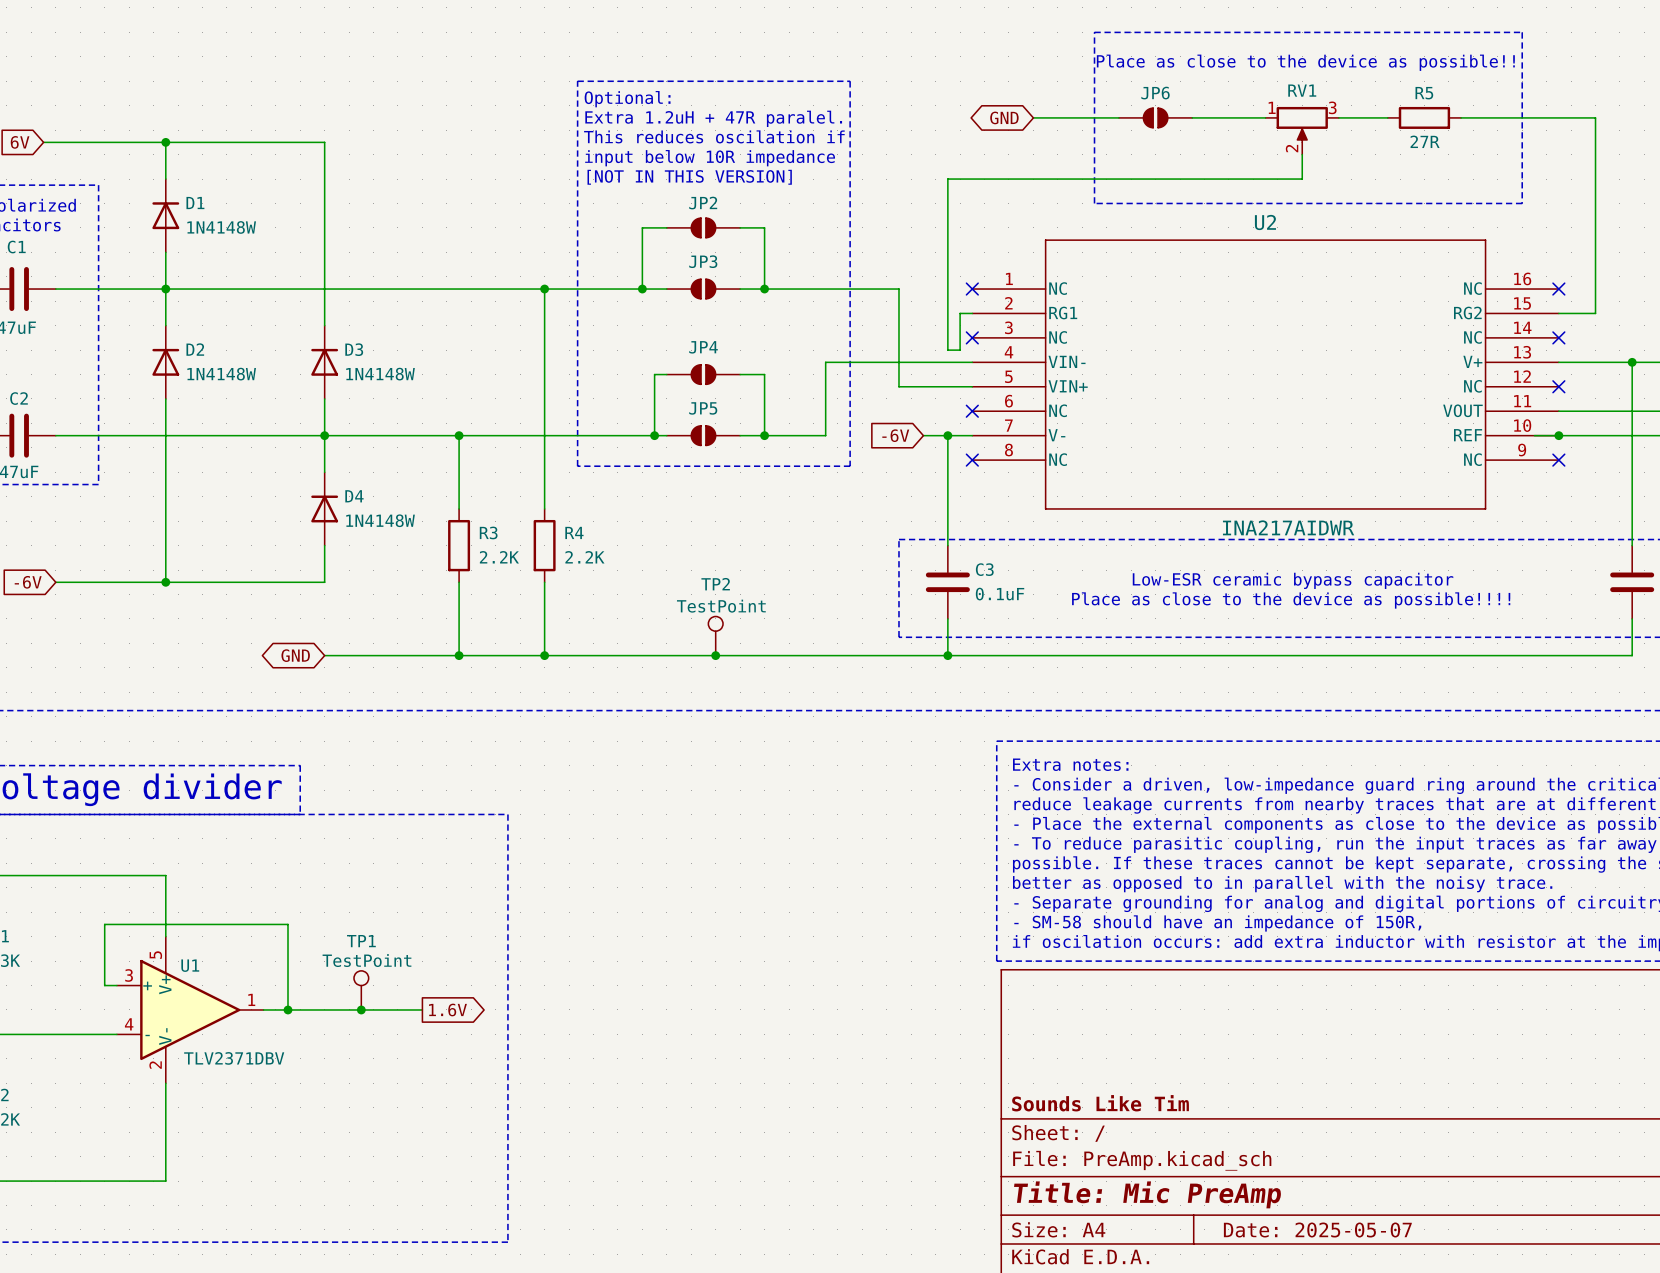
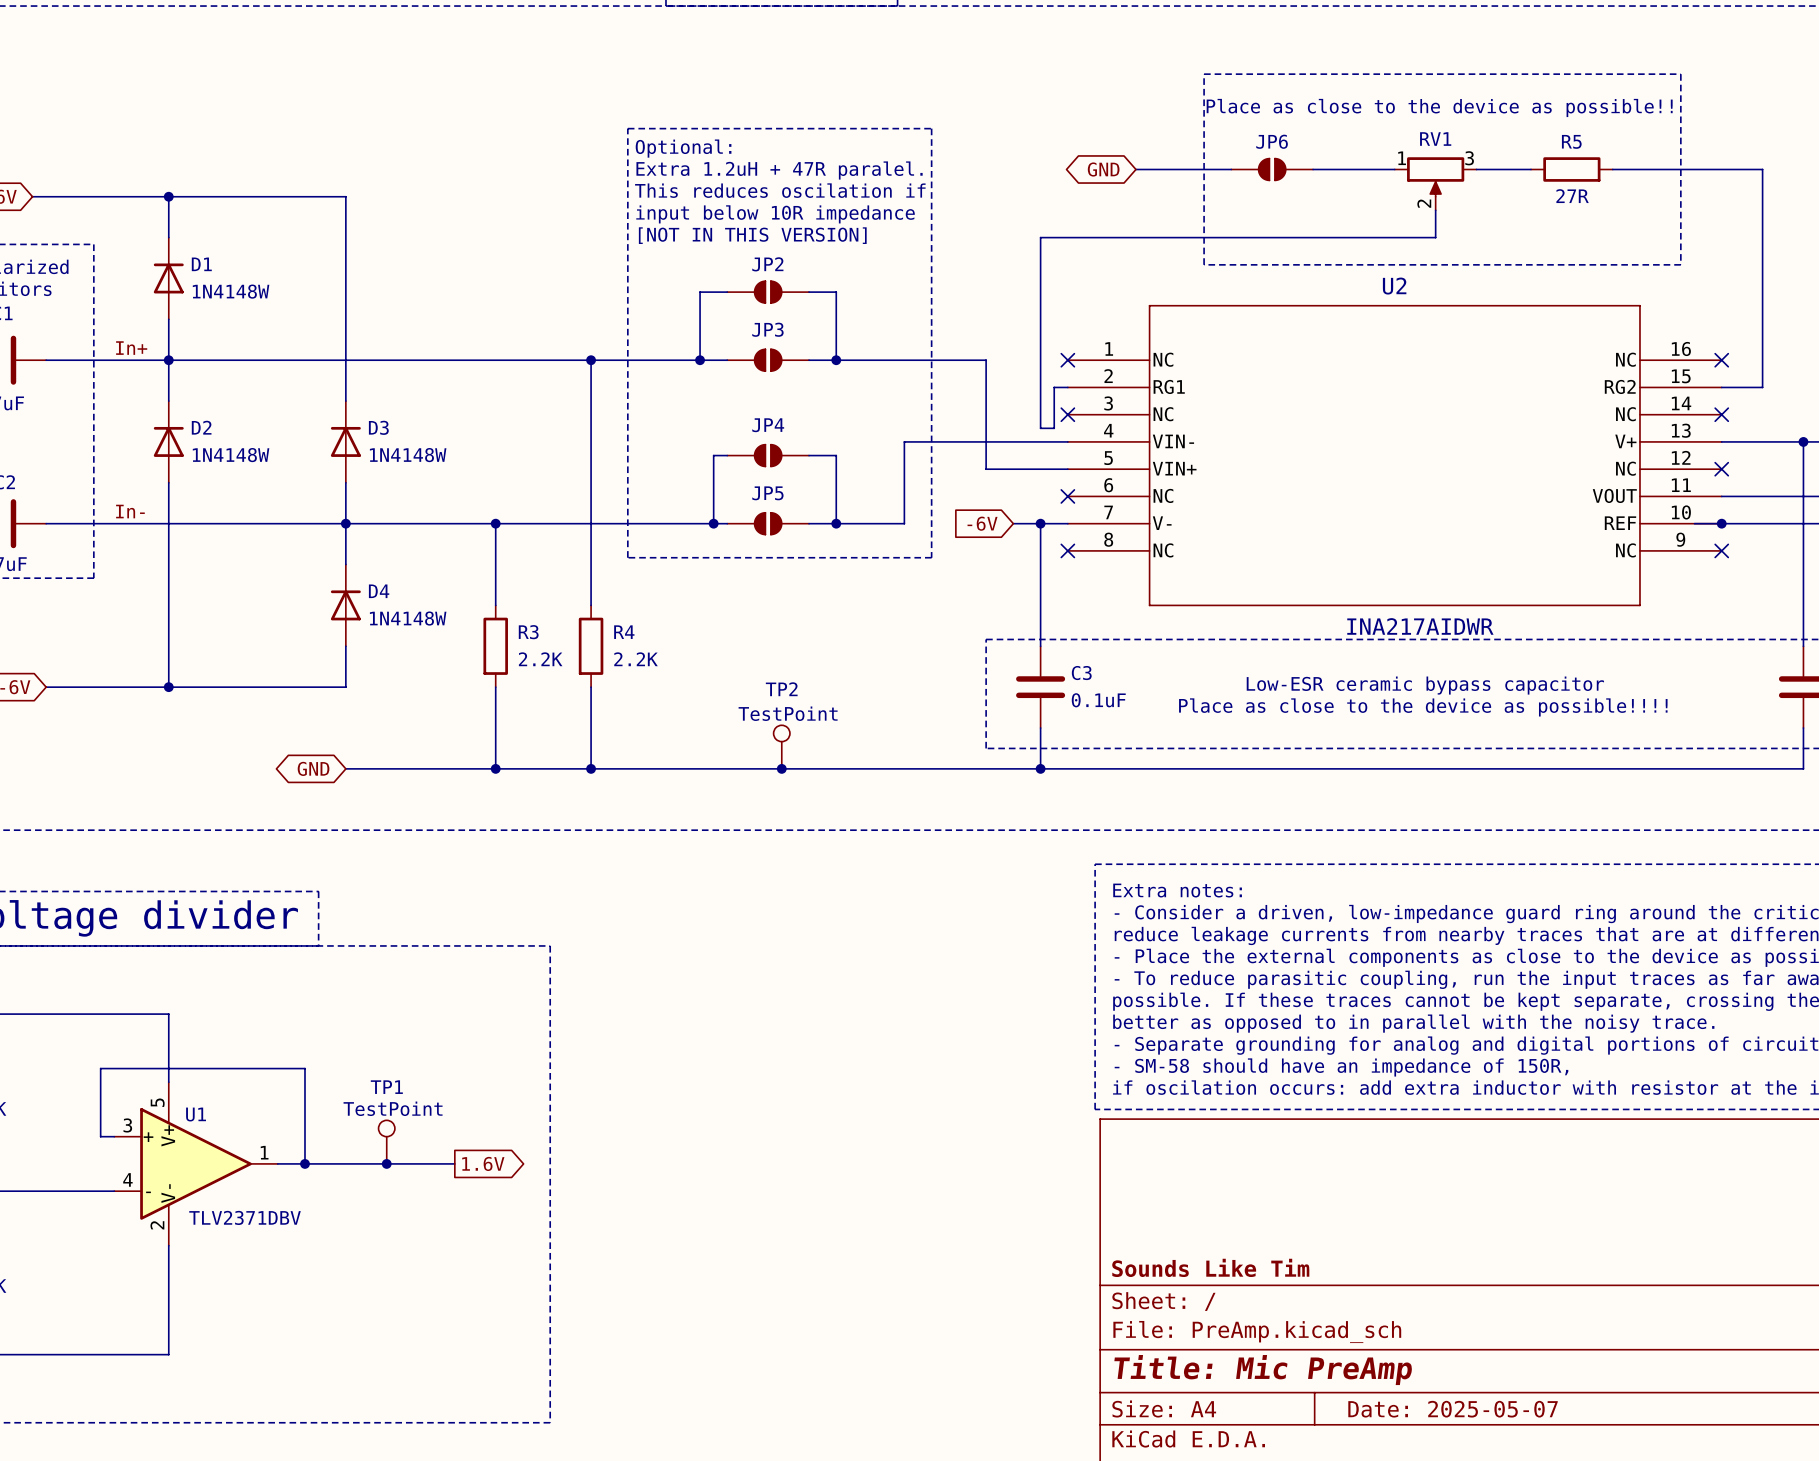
label: none -> In+ (131, 348)
label: none -> In- (130, 511)

